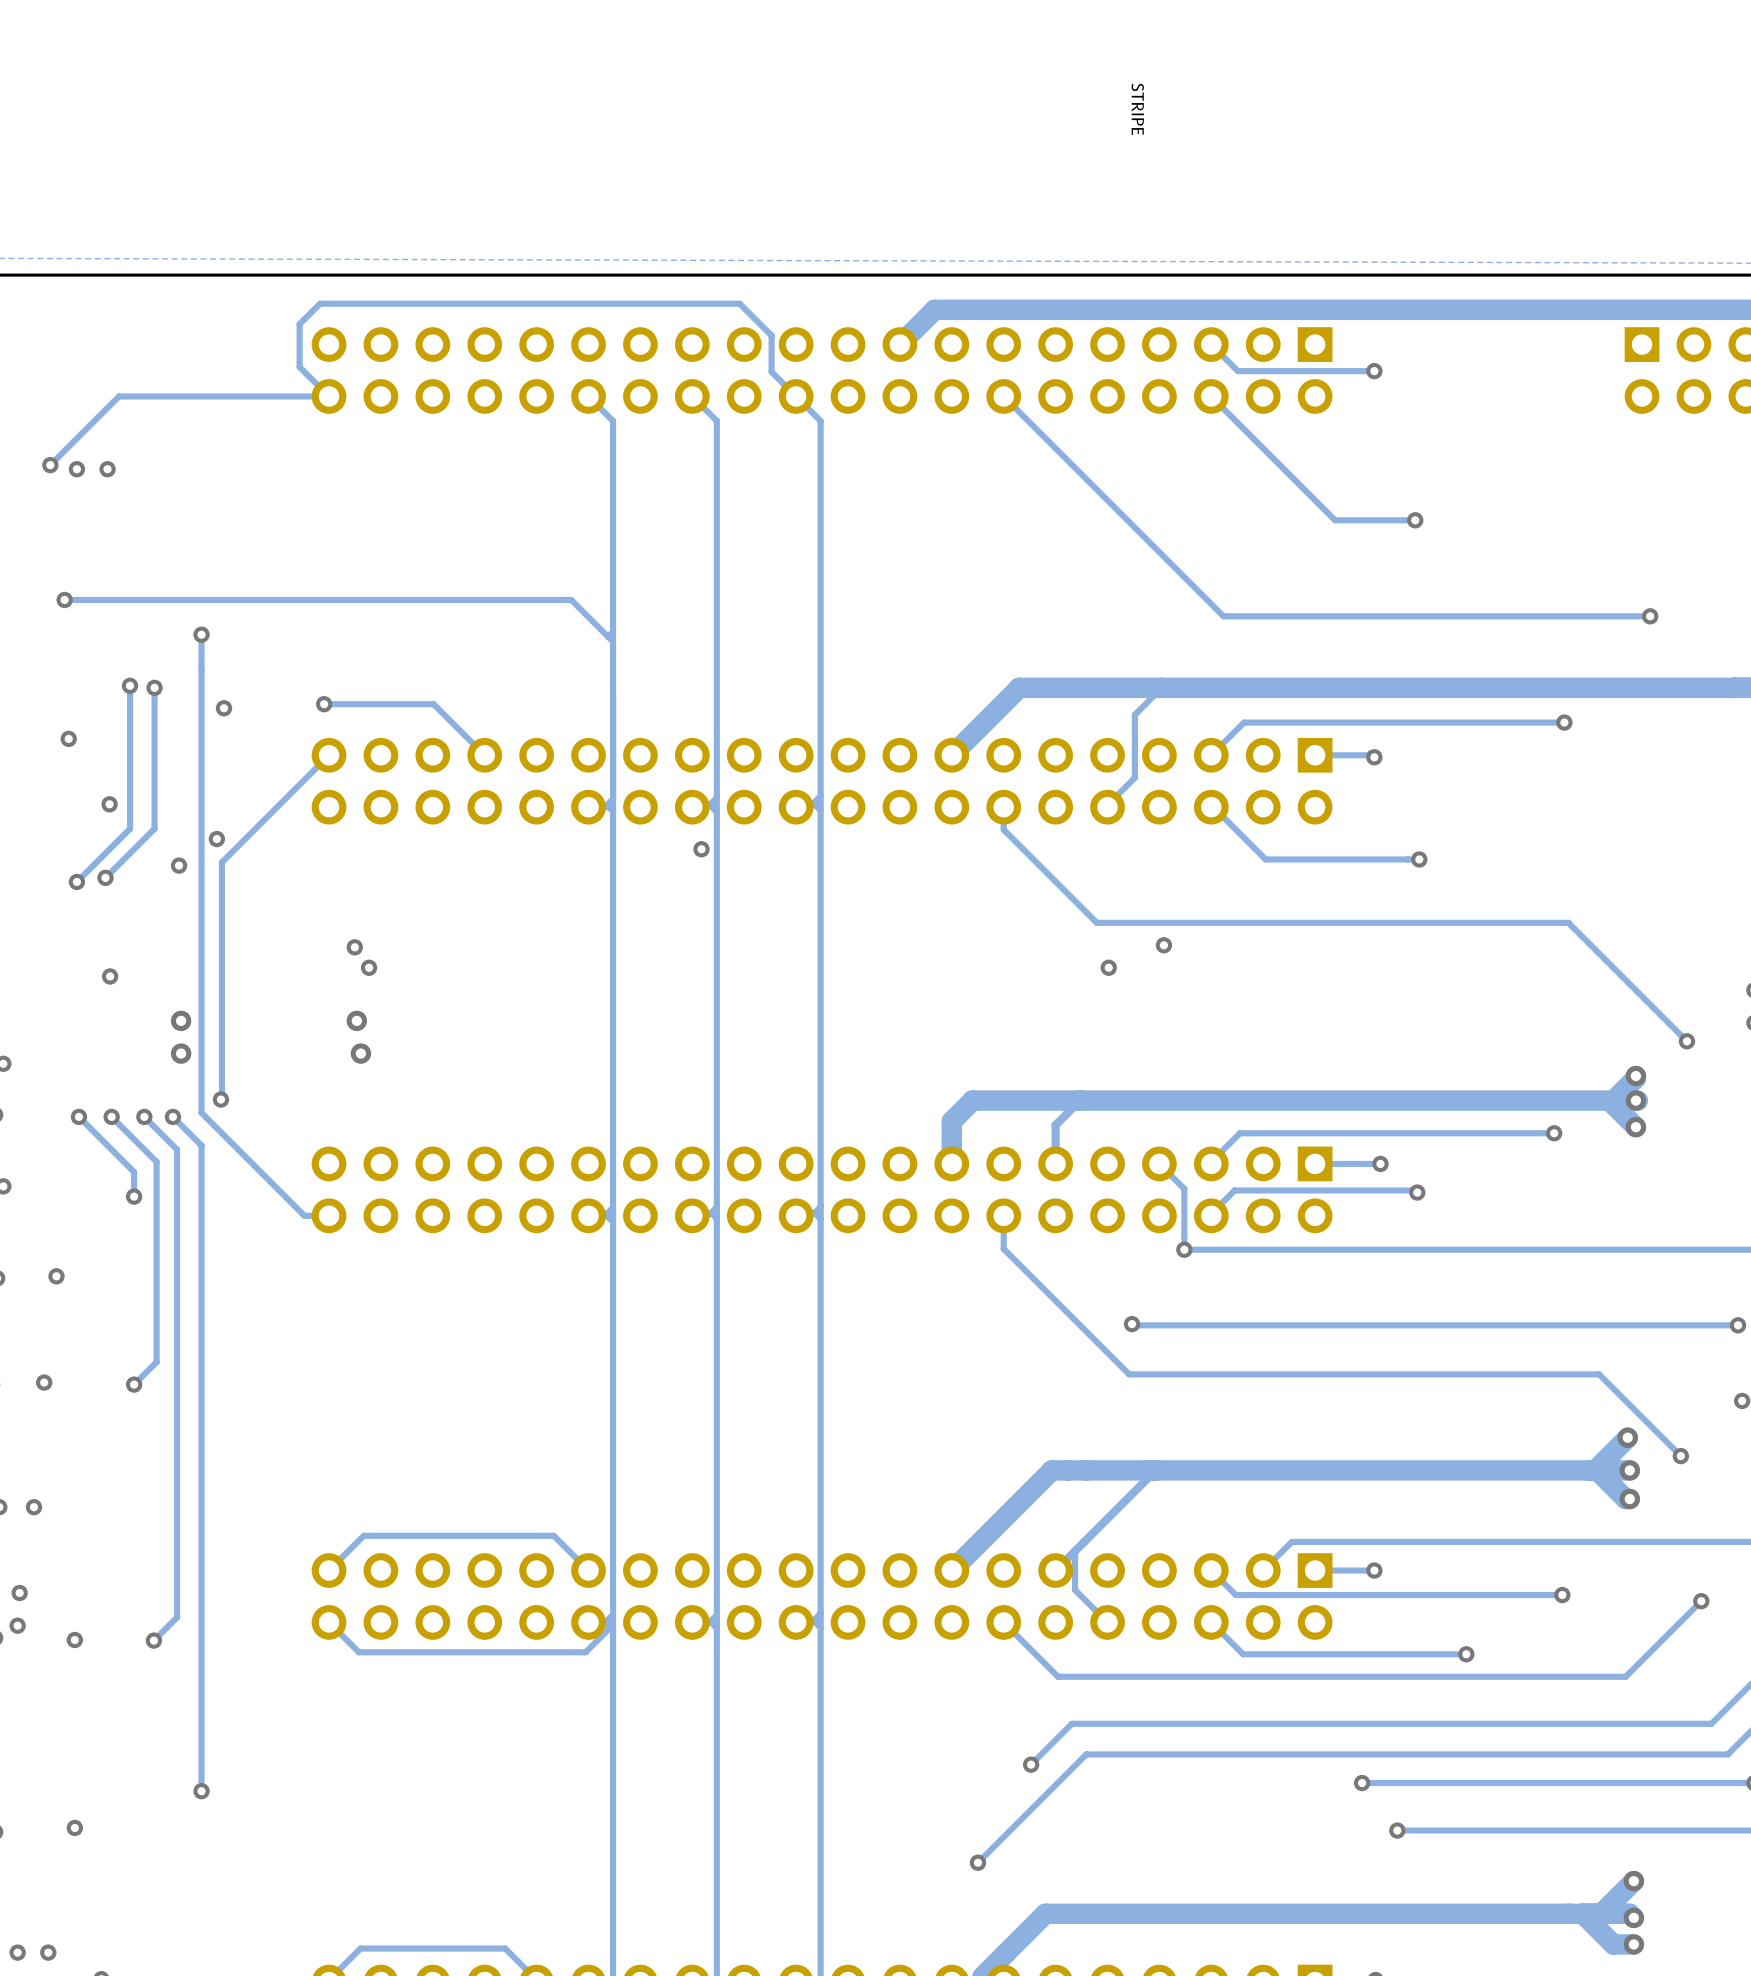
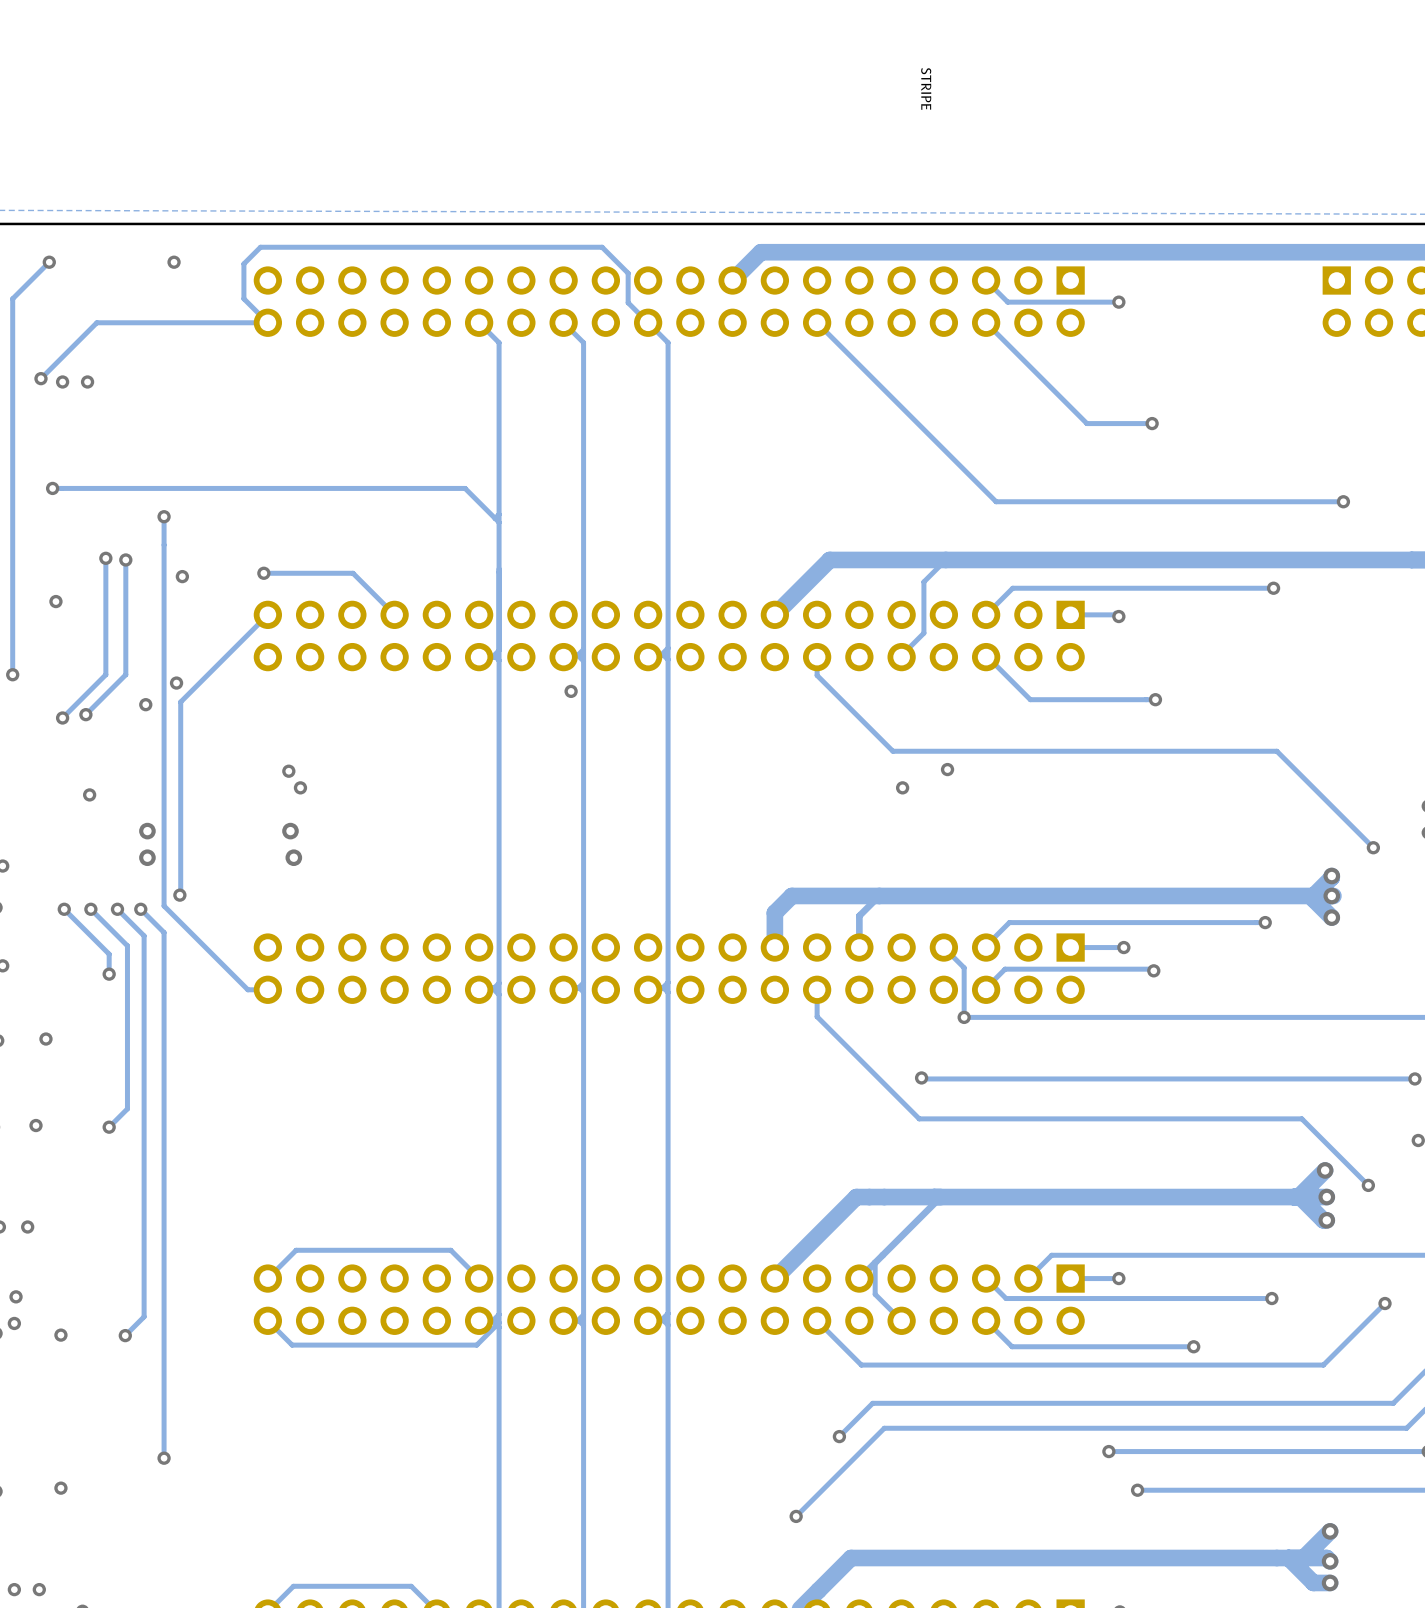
track: none -> (49, 262) (12, 298) (12, 674)
via: none -> (49, 262)
via: none -> (174, 262)
via position: (109, 804) -> (12, 674)

